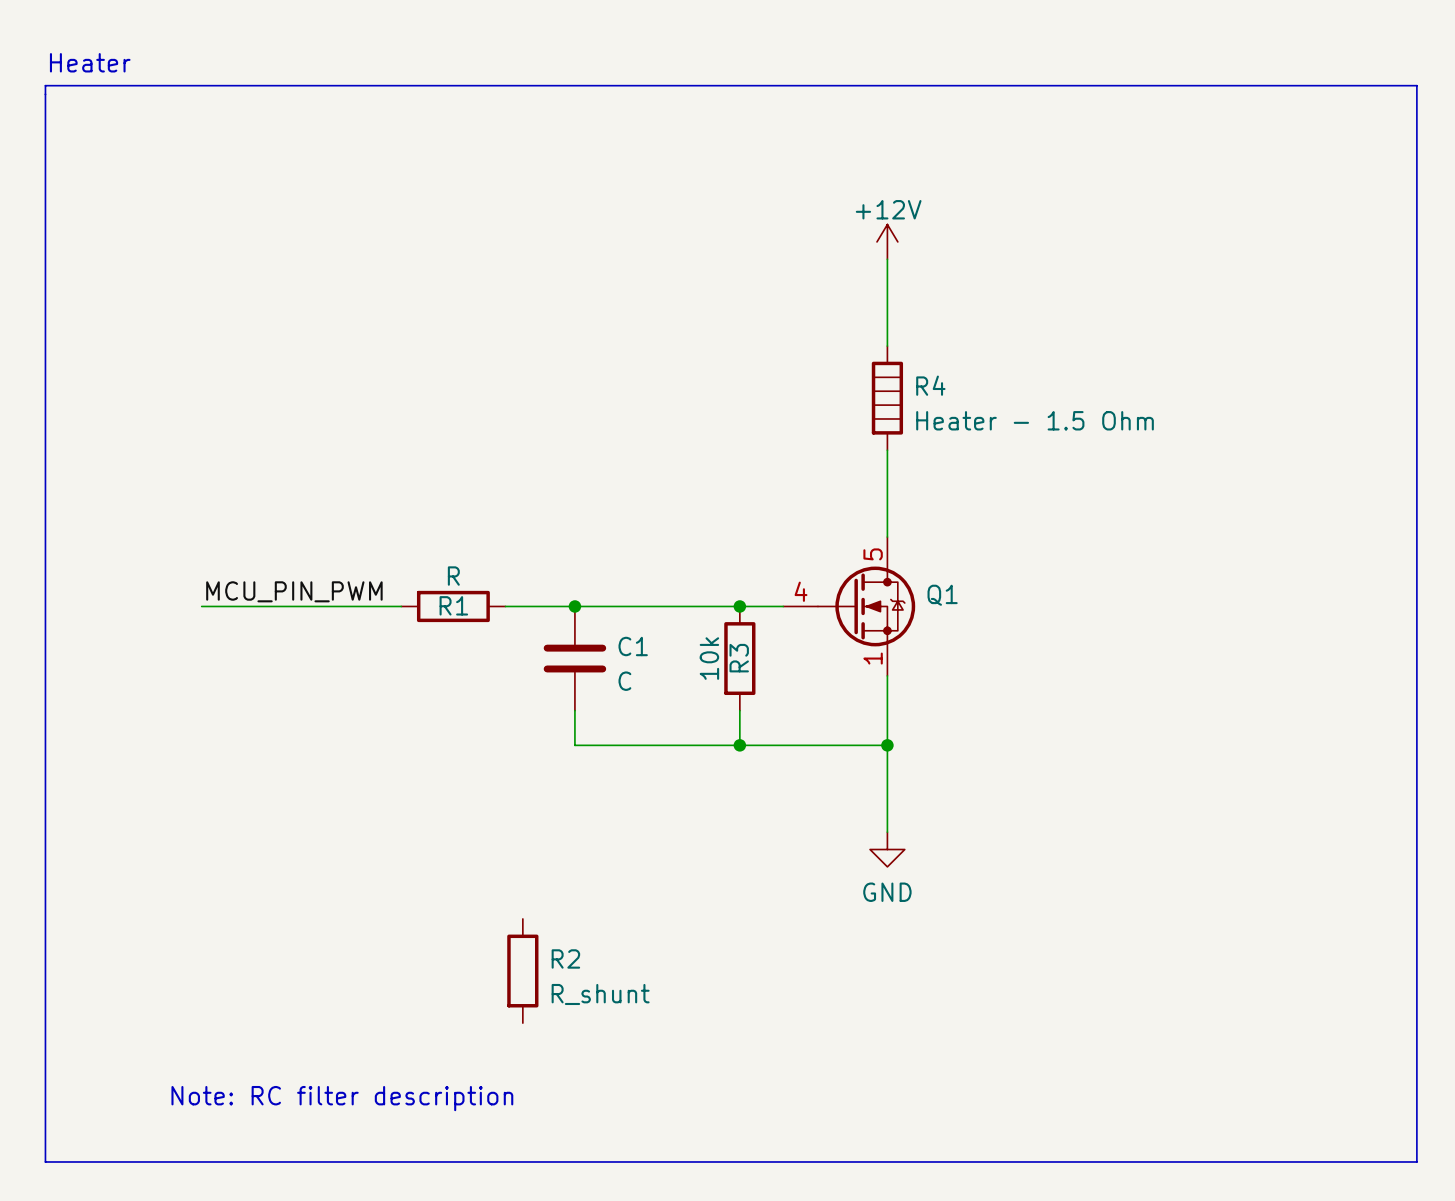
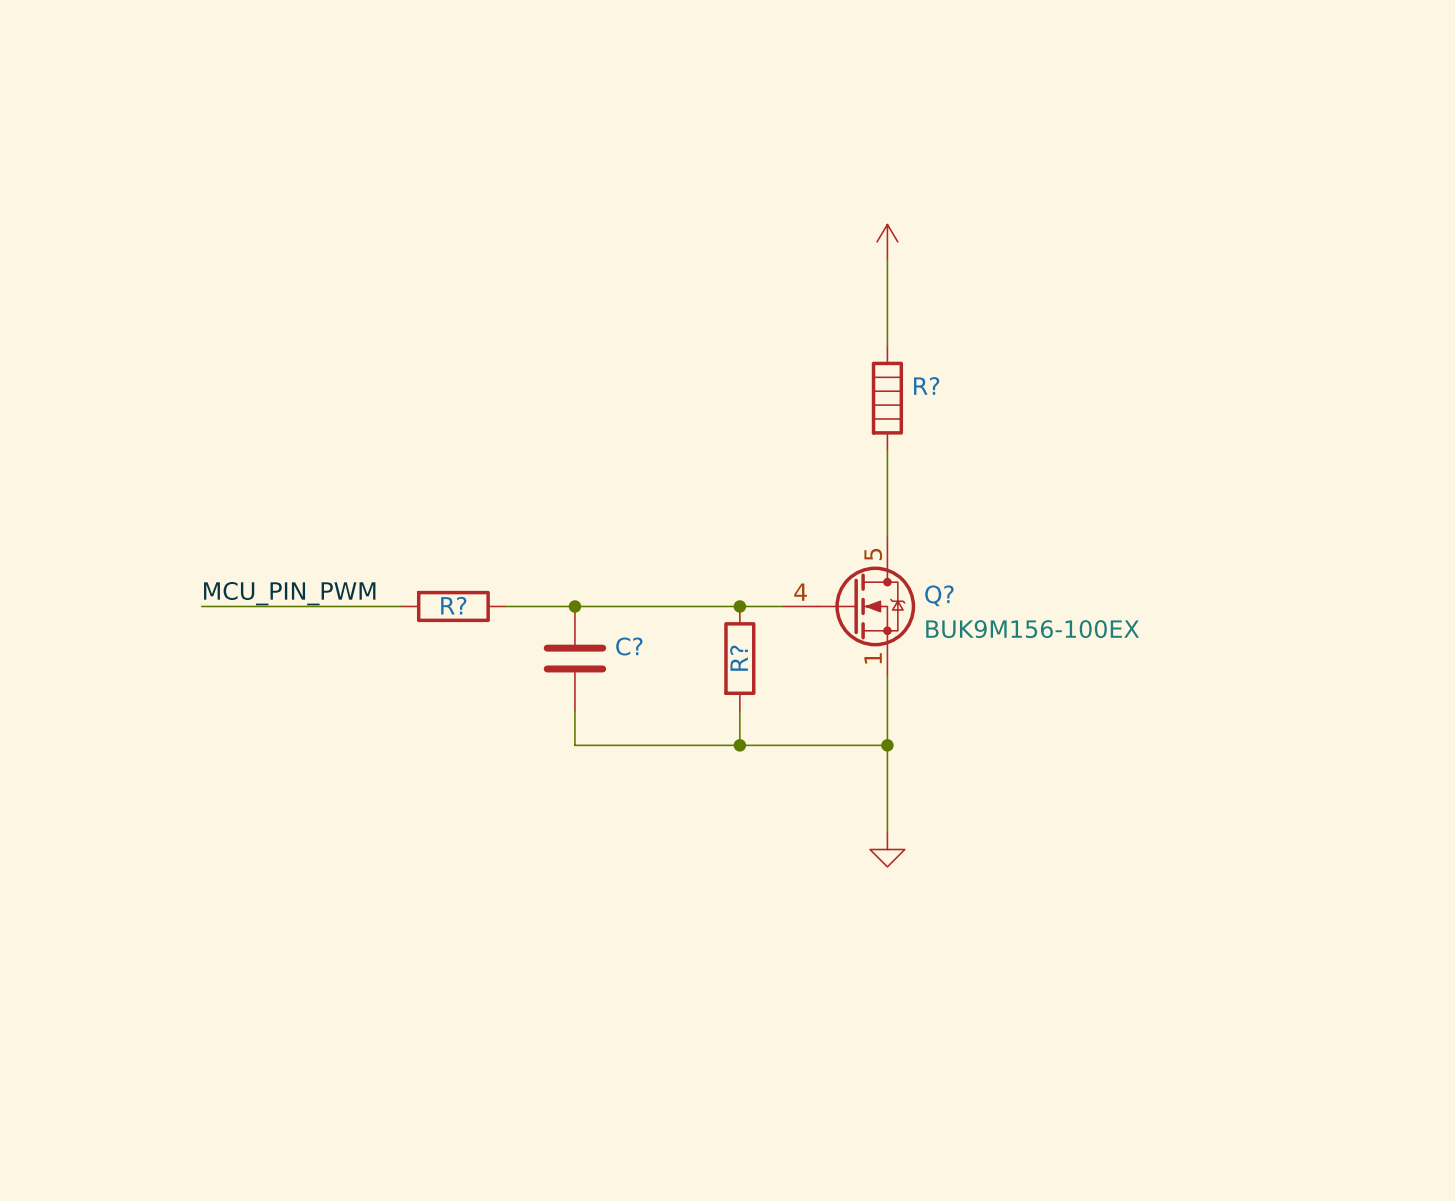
text: Heater (90, 62) -> none
line: (45, 85) (45, 1161) (1416, 1161) (1416, 85) (45, 85) -> none
power symbol text: +12V (888, 209) -> none
R4 name: R4 (930, 385) -> R? (926, 385)
R4 value: Heater - 1.5 Ohm (1035, 420) -> none
R1 value: R (453, 576) -> none
Q1 name: Q1 (942, 595) -> Q? (939, 595)
R1 name: R1 (453, 605) -> R? (453, 605)
Q1 value: none -> BUK9M156-100EX (1032, 629)
C1 name: C1 (633, 646) -> C? (629, 646)
R3 value: 10k (709, 658) -> none
R3 name: R3 (739, 658) -> R? (739, 658)
C1 value: C (624, 681) -> none
power symbol text: GND (887, 892) -> none
R2: R_shunt (522, 971) -> none
text: Note: RC filter description (342, 1098) -> none

